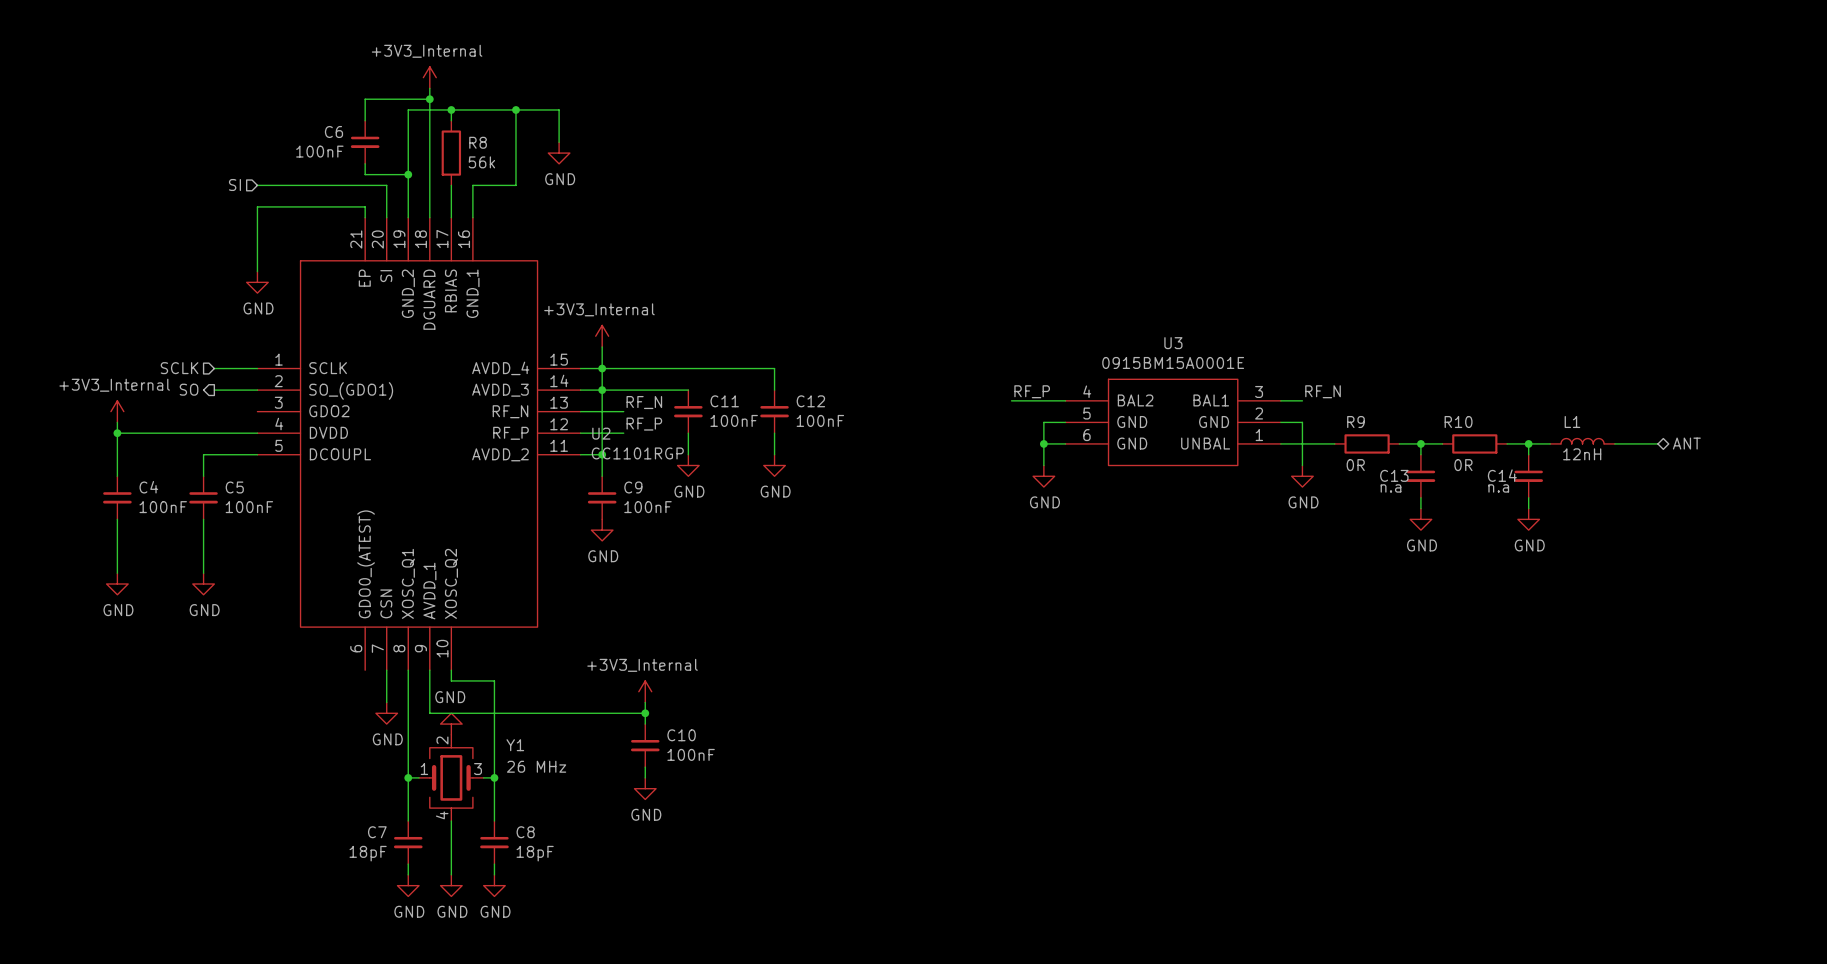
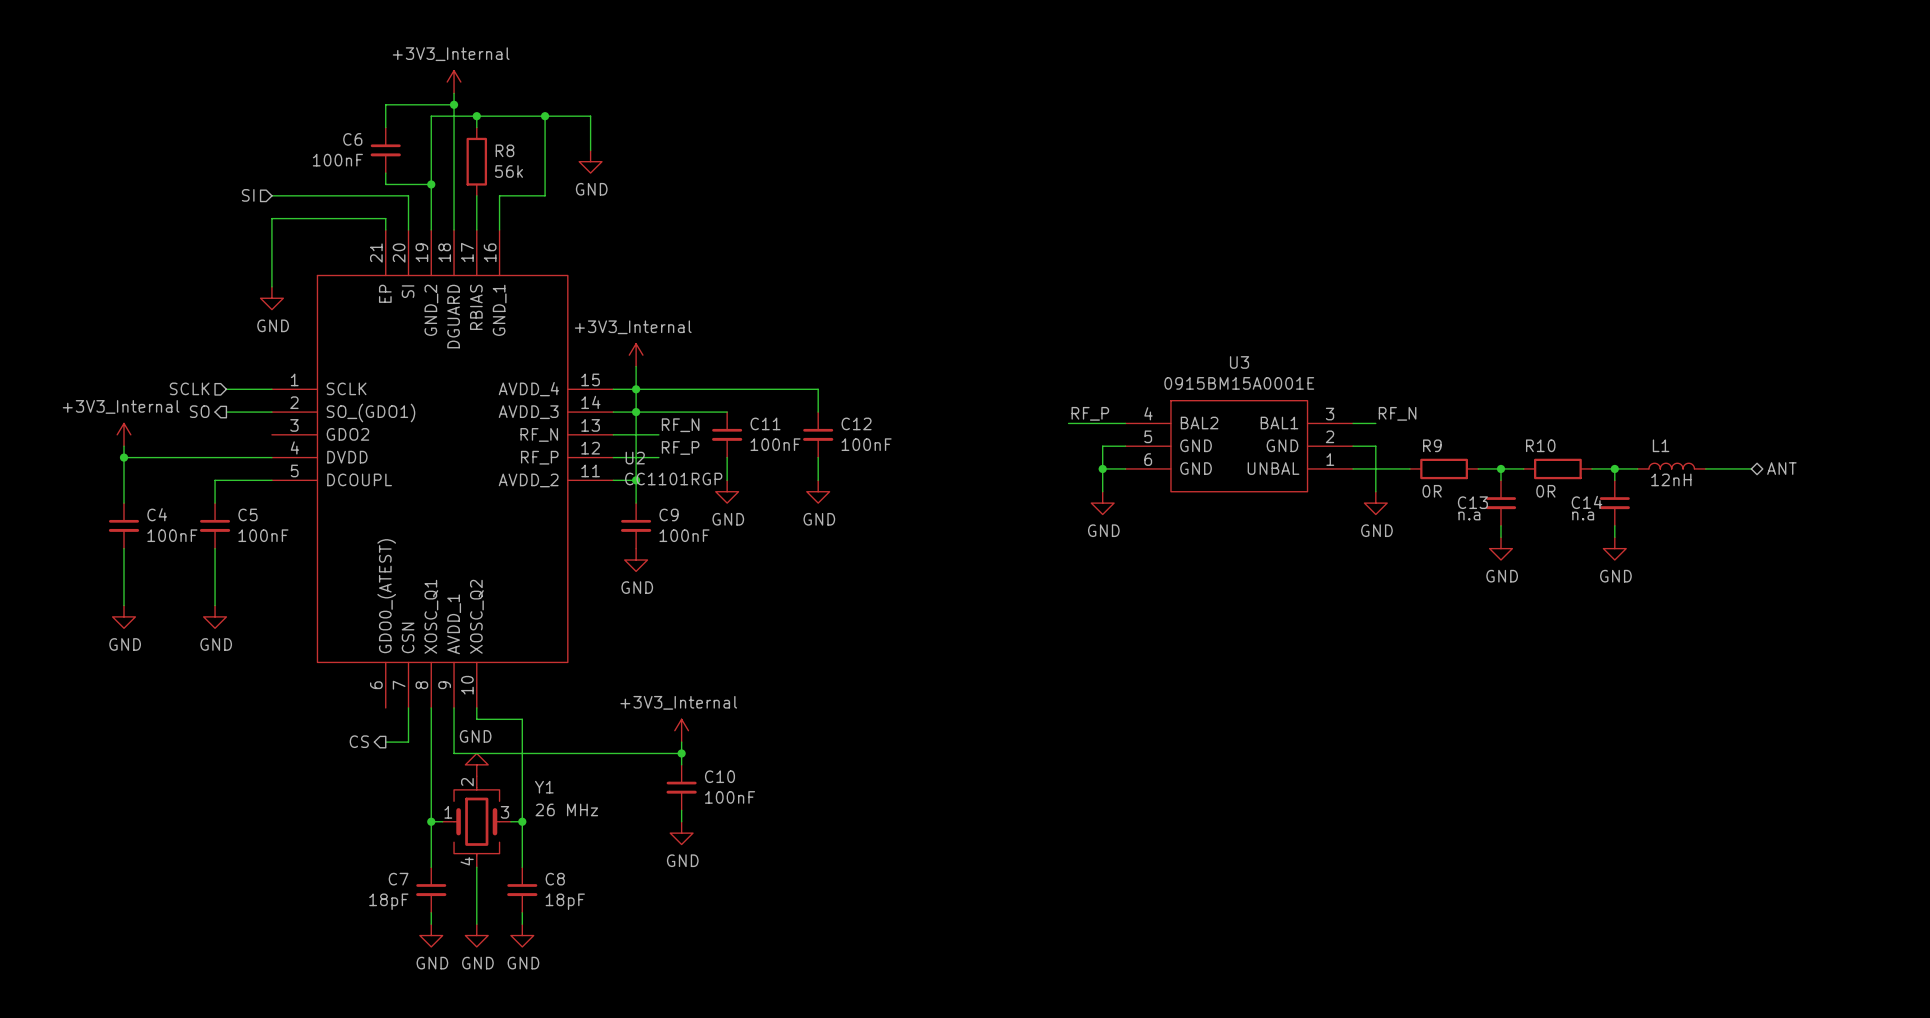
hierarchical label: none -> CS (359, 741)
wire: none -> (385, 742) (408, 742)
power symbol: GND (386, 713) -> none

